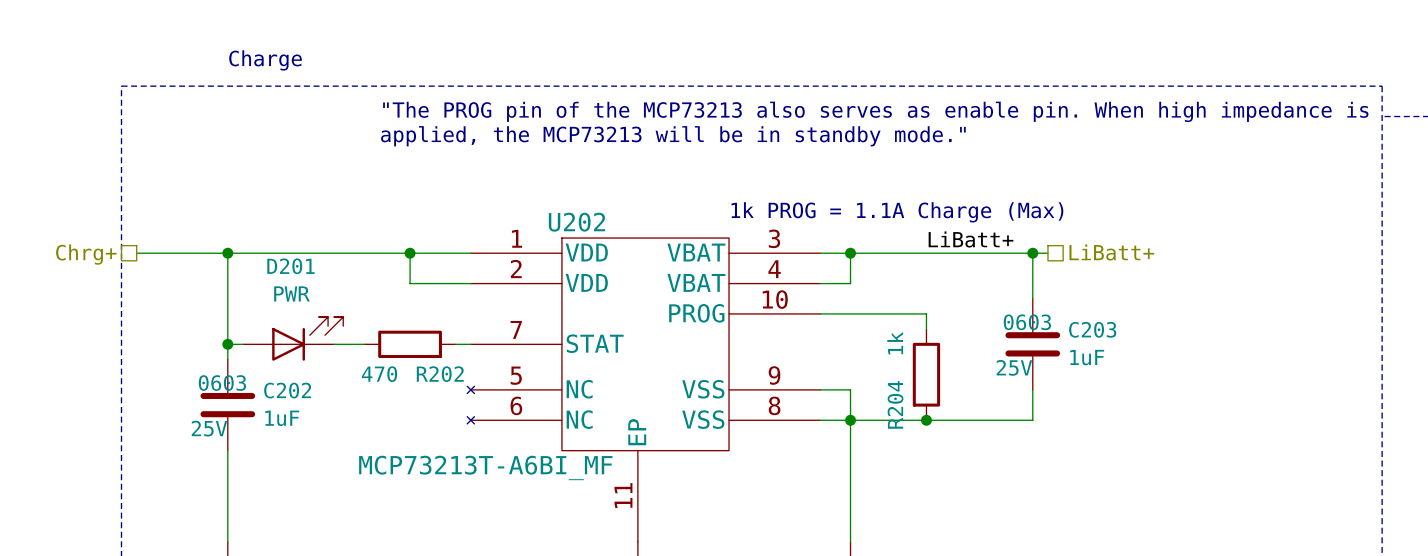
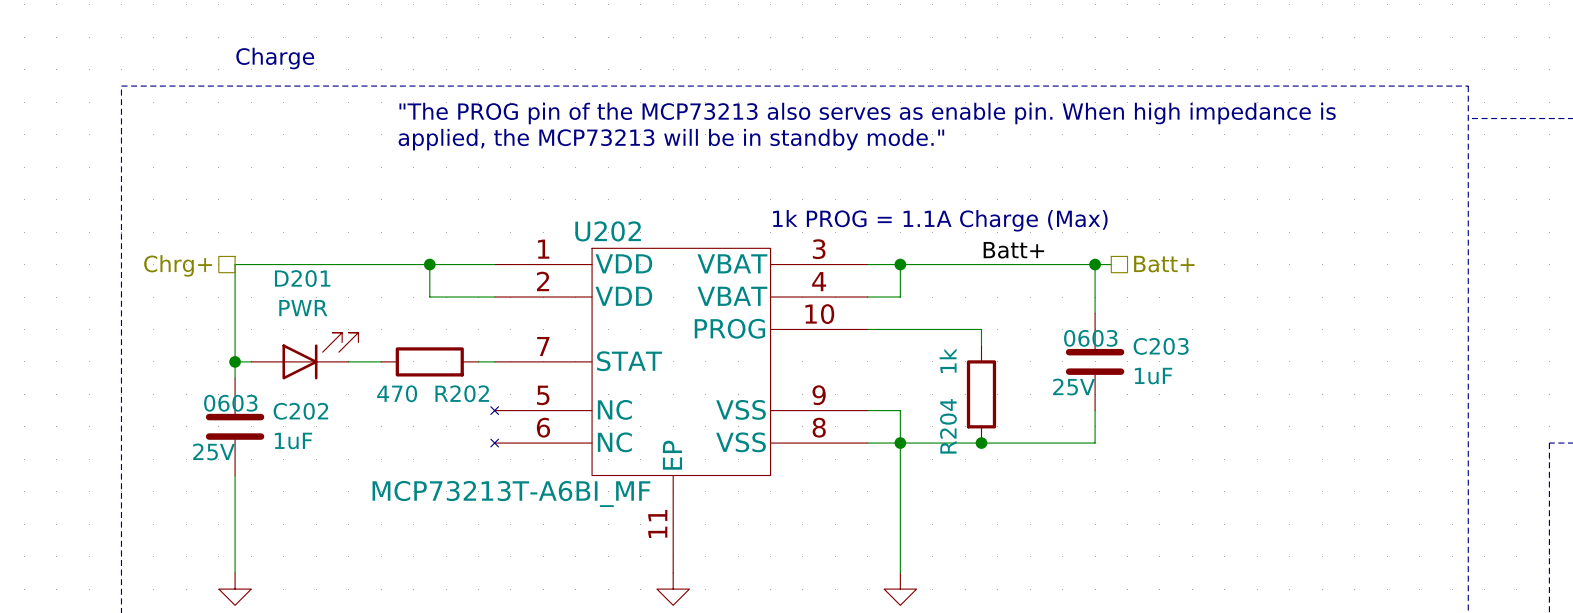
label: LiBatt+ (971, 239) -> Batt+ (1013, 250)
hierarchical label: LiBatt+ (1111, 252) -> Batt+ (1164, 264)
wire: (136, 253) (227, 253) -> none
junction: (227, 253) -> none
hierarchical label position: Chrg+ (86, 254) -> Chrg+ (178, 265)

